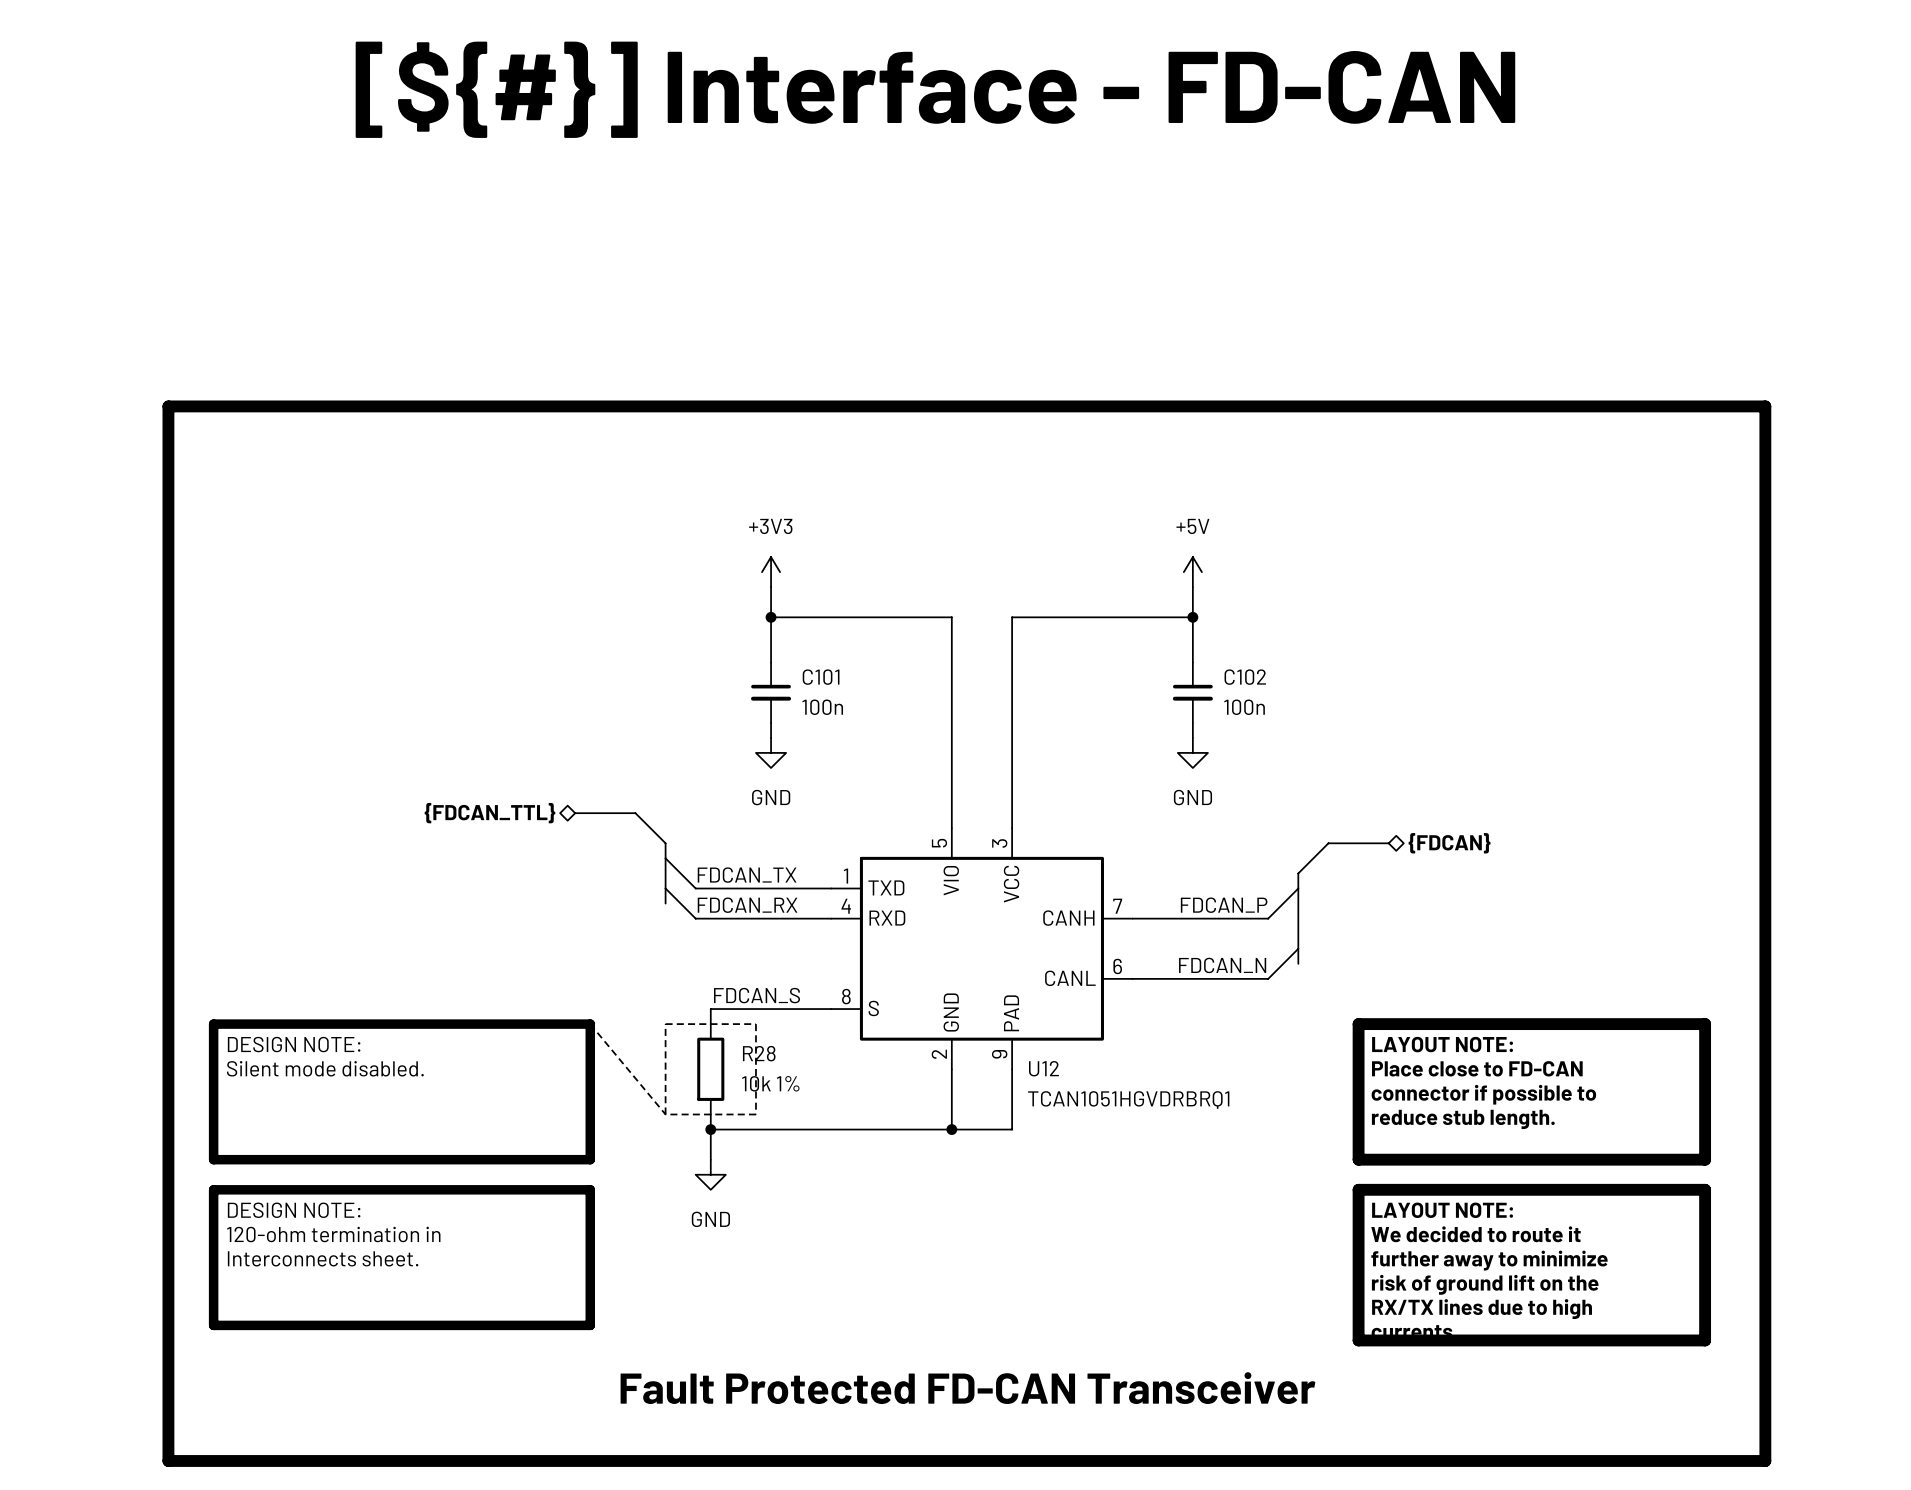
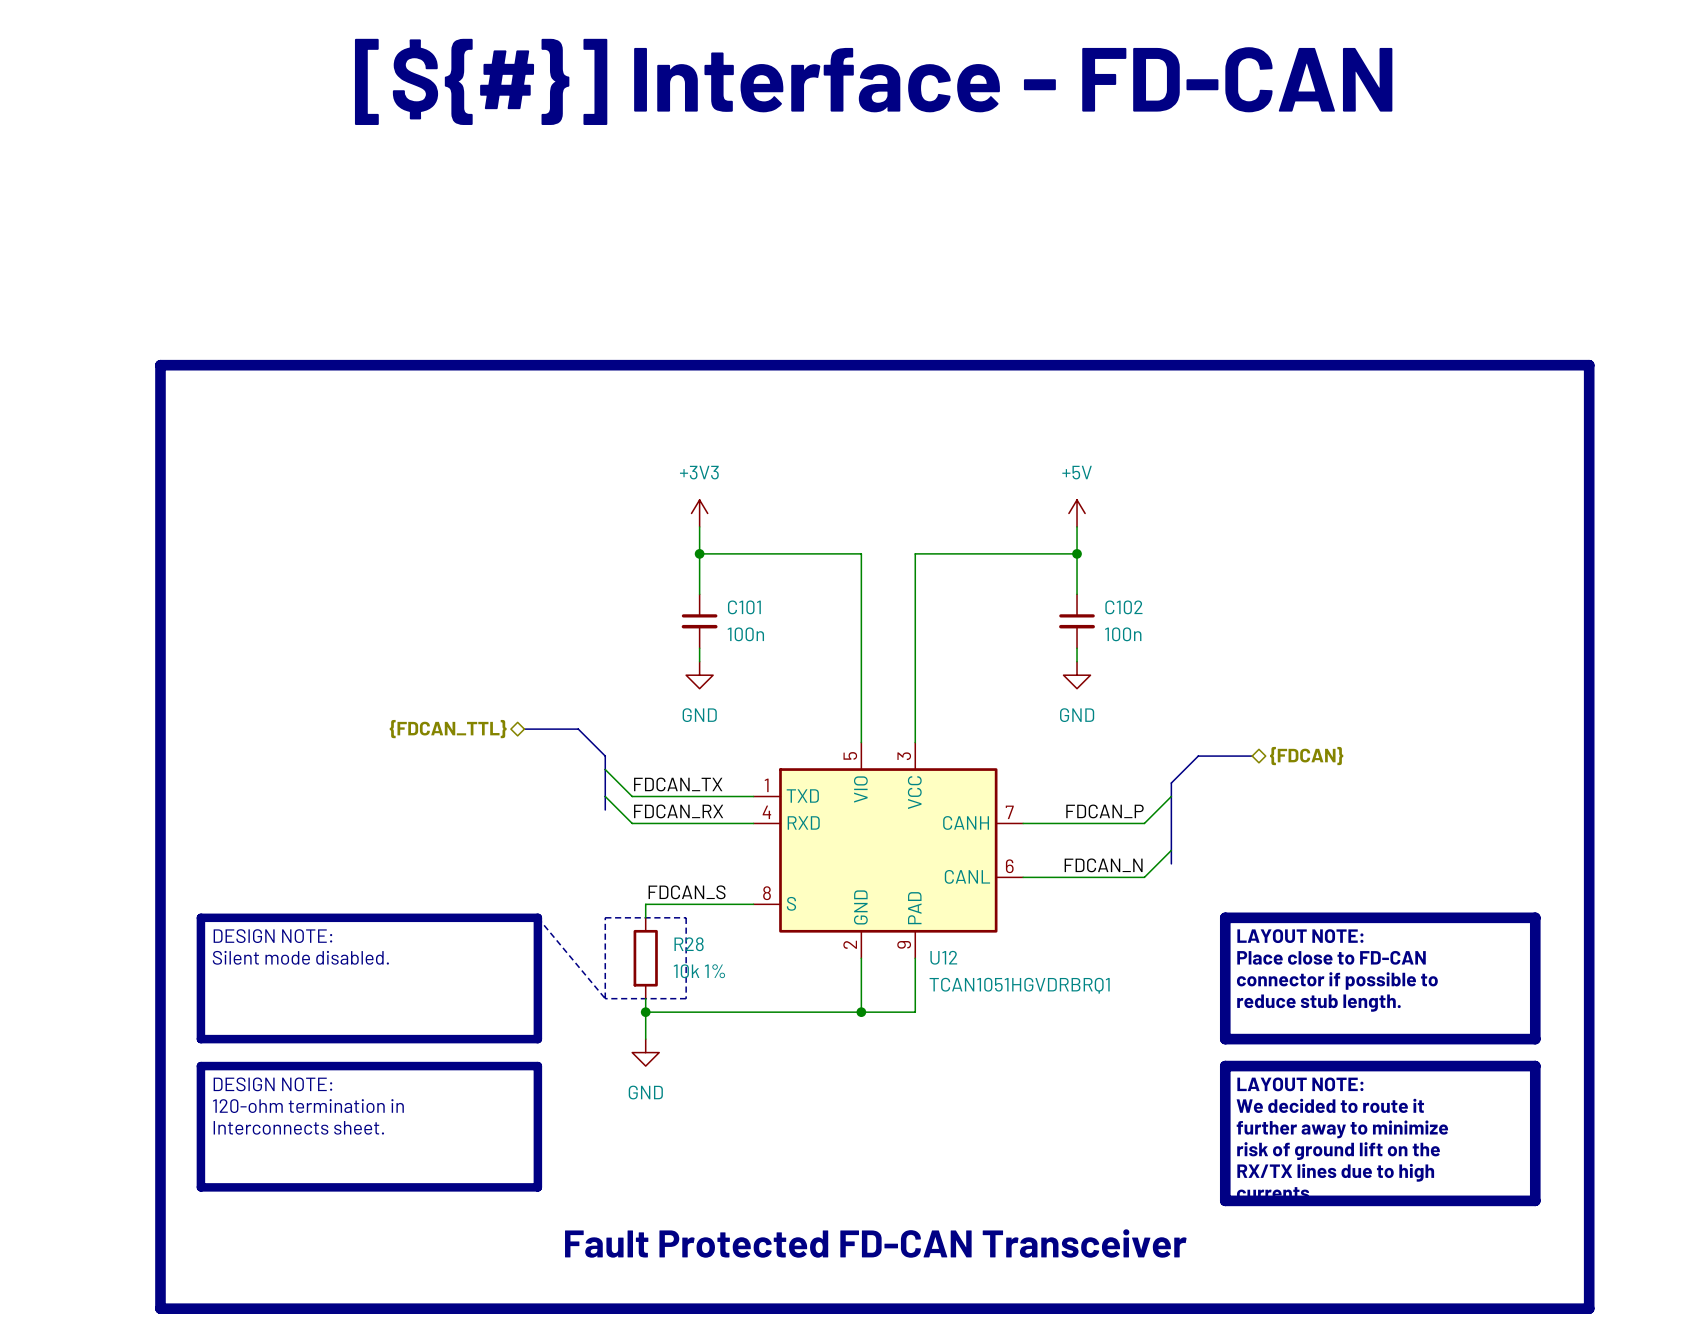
text position: [${#}] Interface - FD-CAN (935, 89) -> [${#}] Interface - FD-CAN (873, 81)

